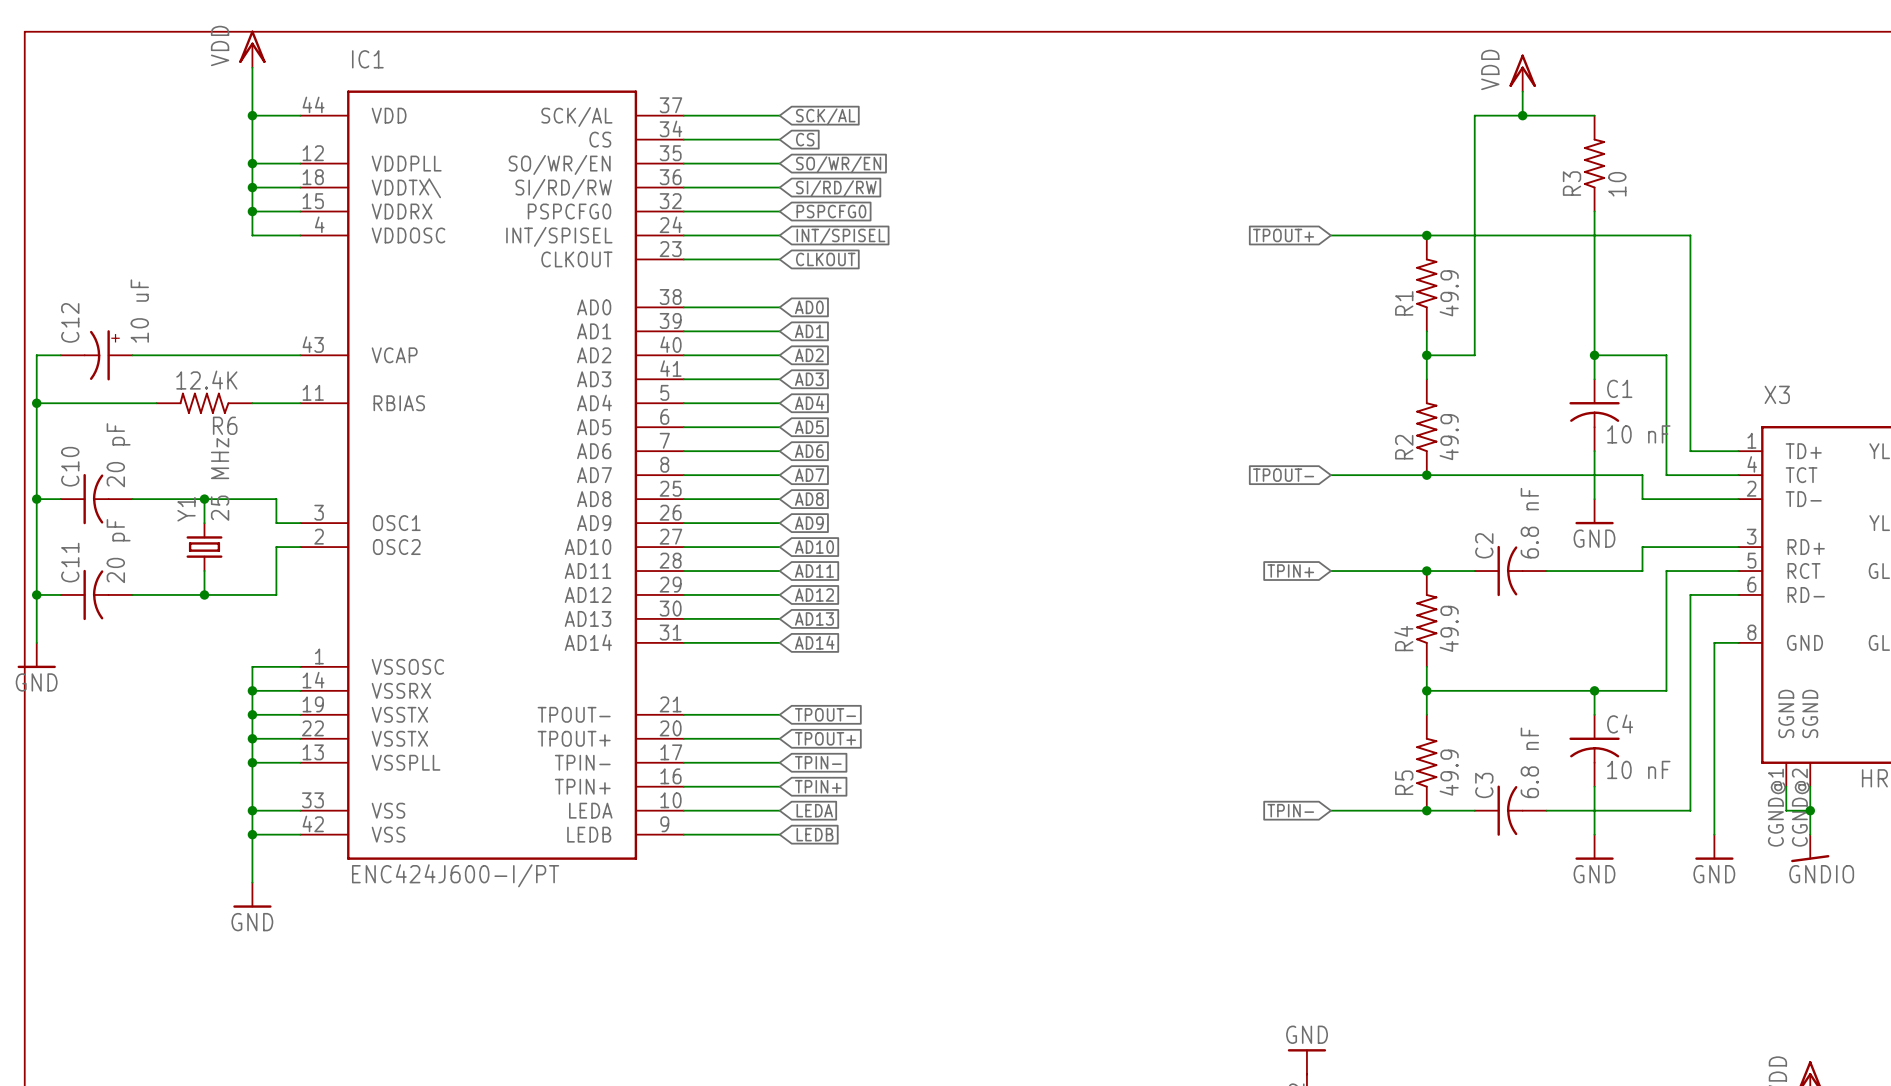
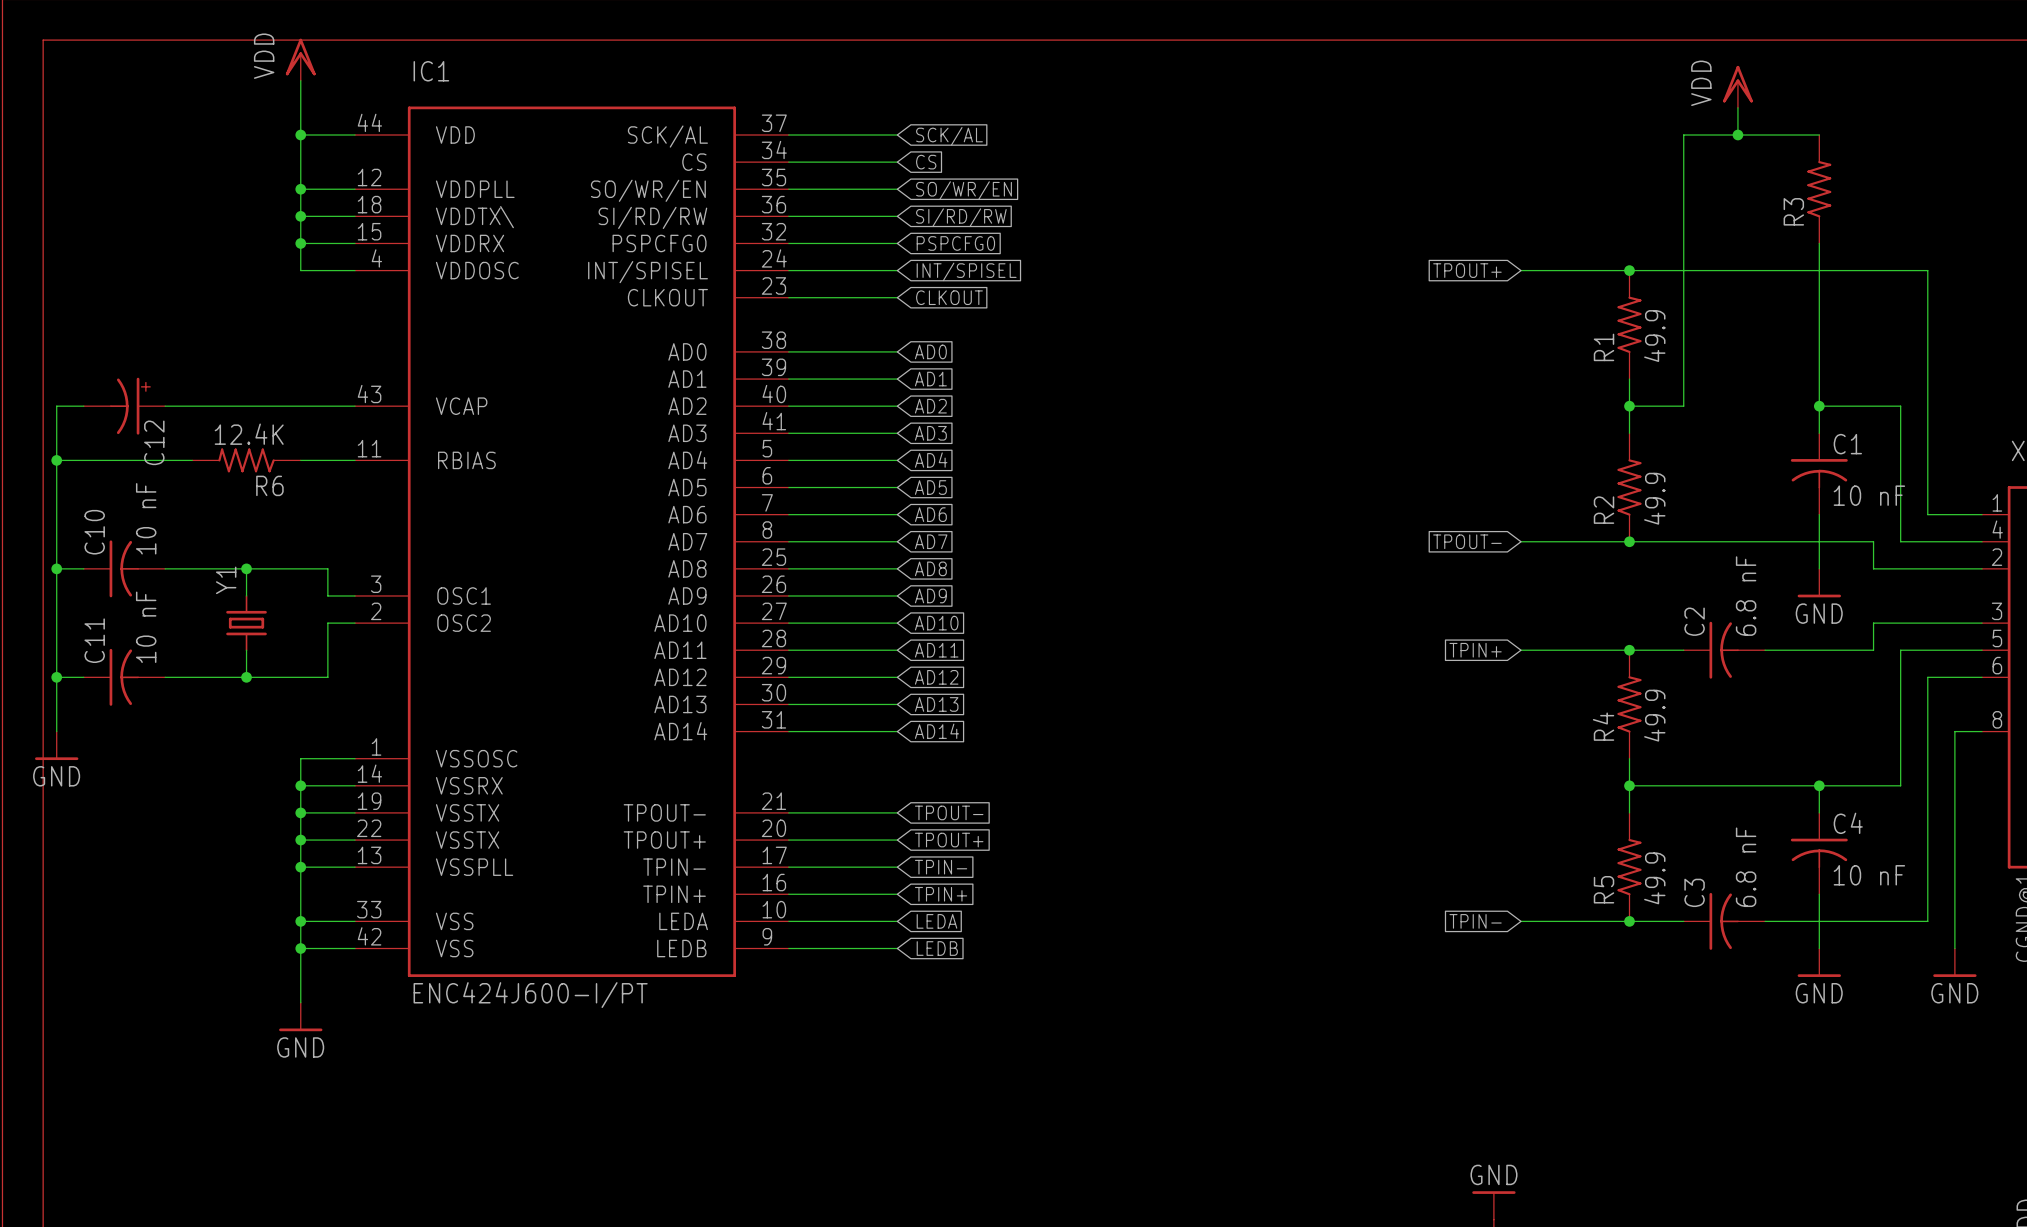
R3 value: 10 (1617, 184) -> none
C12 value: 10 uF (139, 311) -> none
C12 name position: C12 (70, 322) -> C12 (154, 442)
C10 value: 20 pF (118, 455) -> 10 nF (146, 518)
Y1 value: 25 MHz (220, 479) -> none
C11 value: 20 pF (118, 551) -> 10 nF (146, 627)

